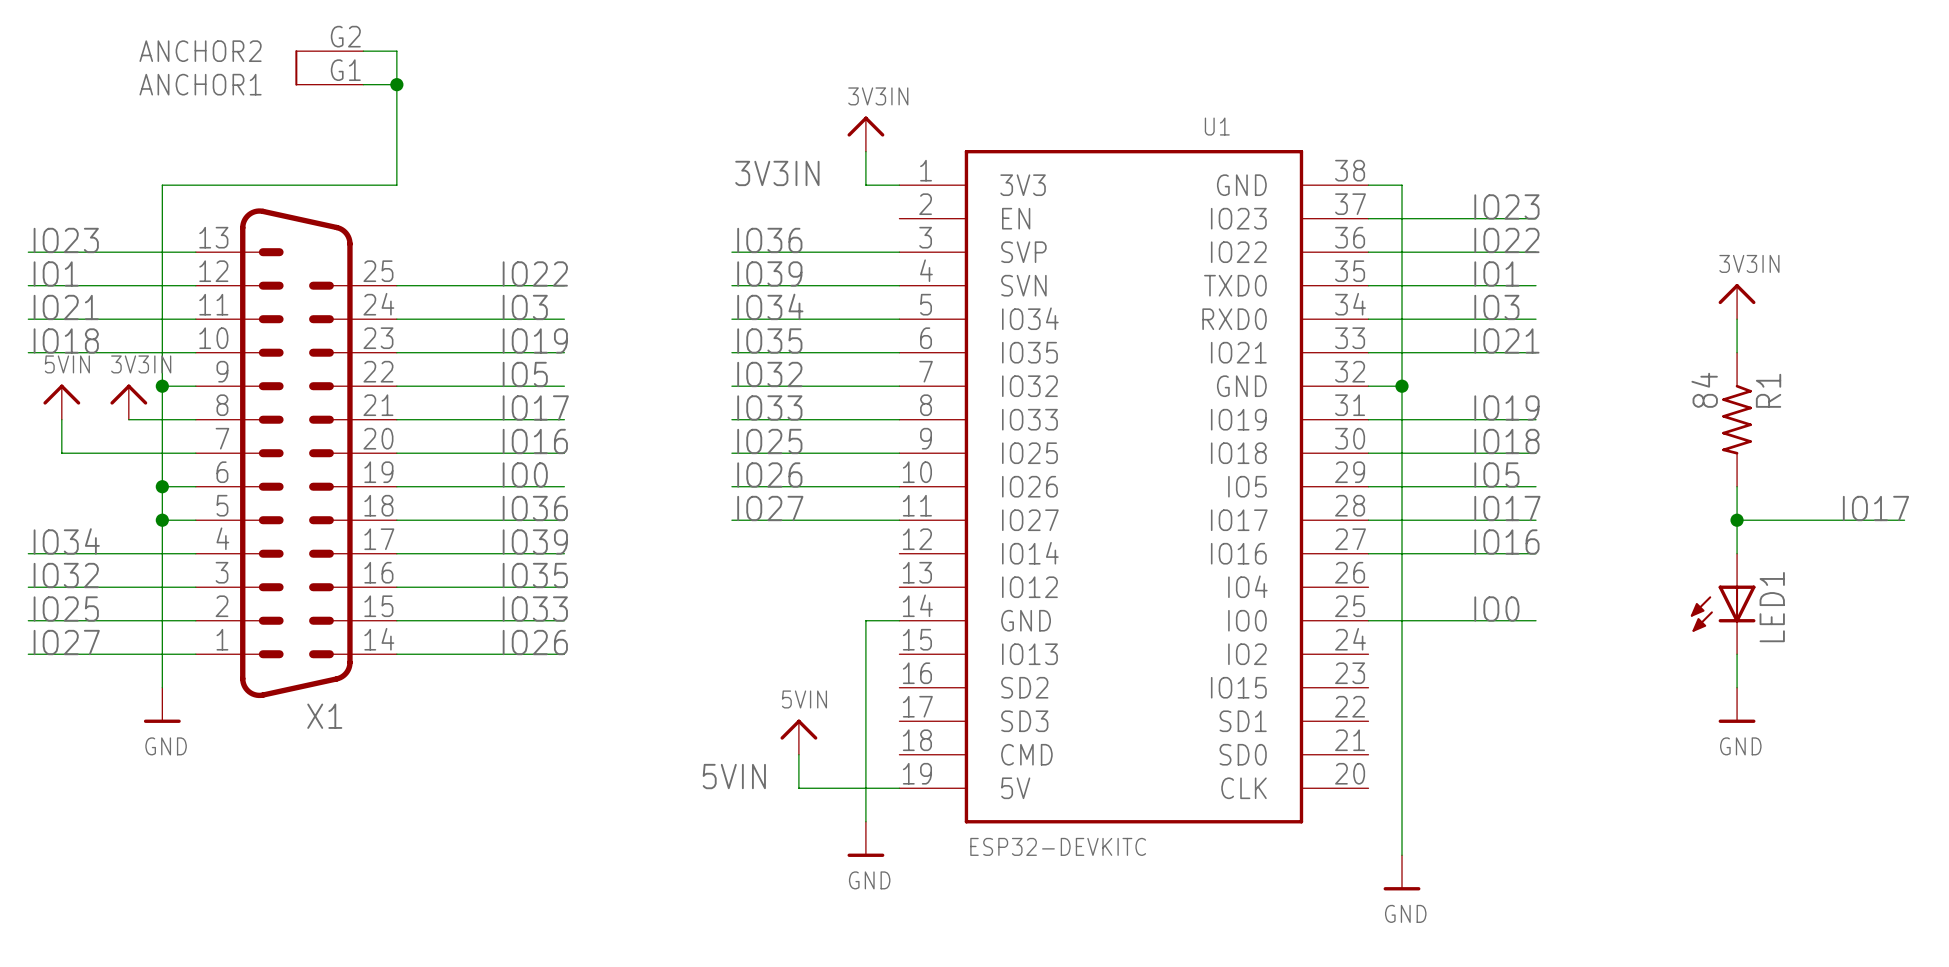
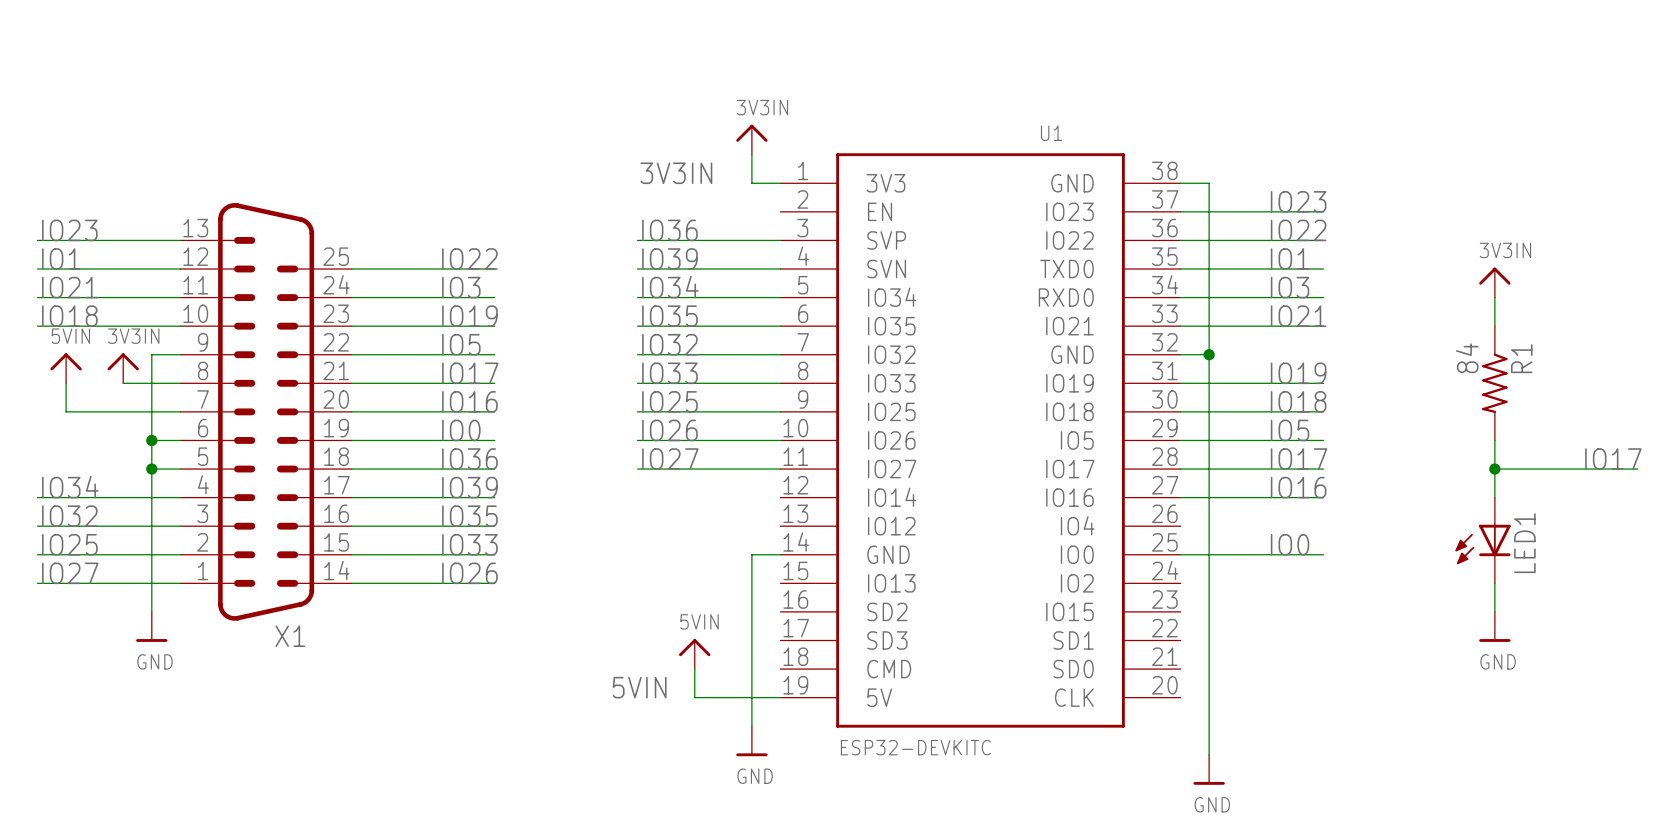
X1 symbol: [195, 50, 397, 699] -> [180, 203, 352, 621]
wire: (363, 51) (396, 51) (396, 185) (162, 185) (162, 386) -> none
wire: (363, 84) (396, 84) -> none
junction: (396, 84) -> none
junction: (162, 386) -> none

